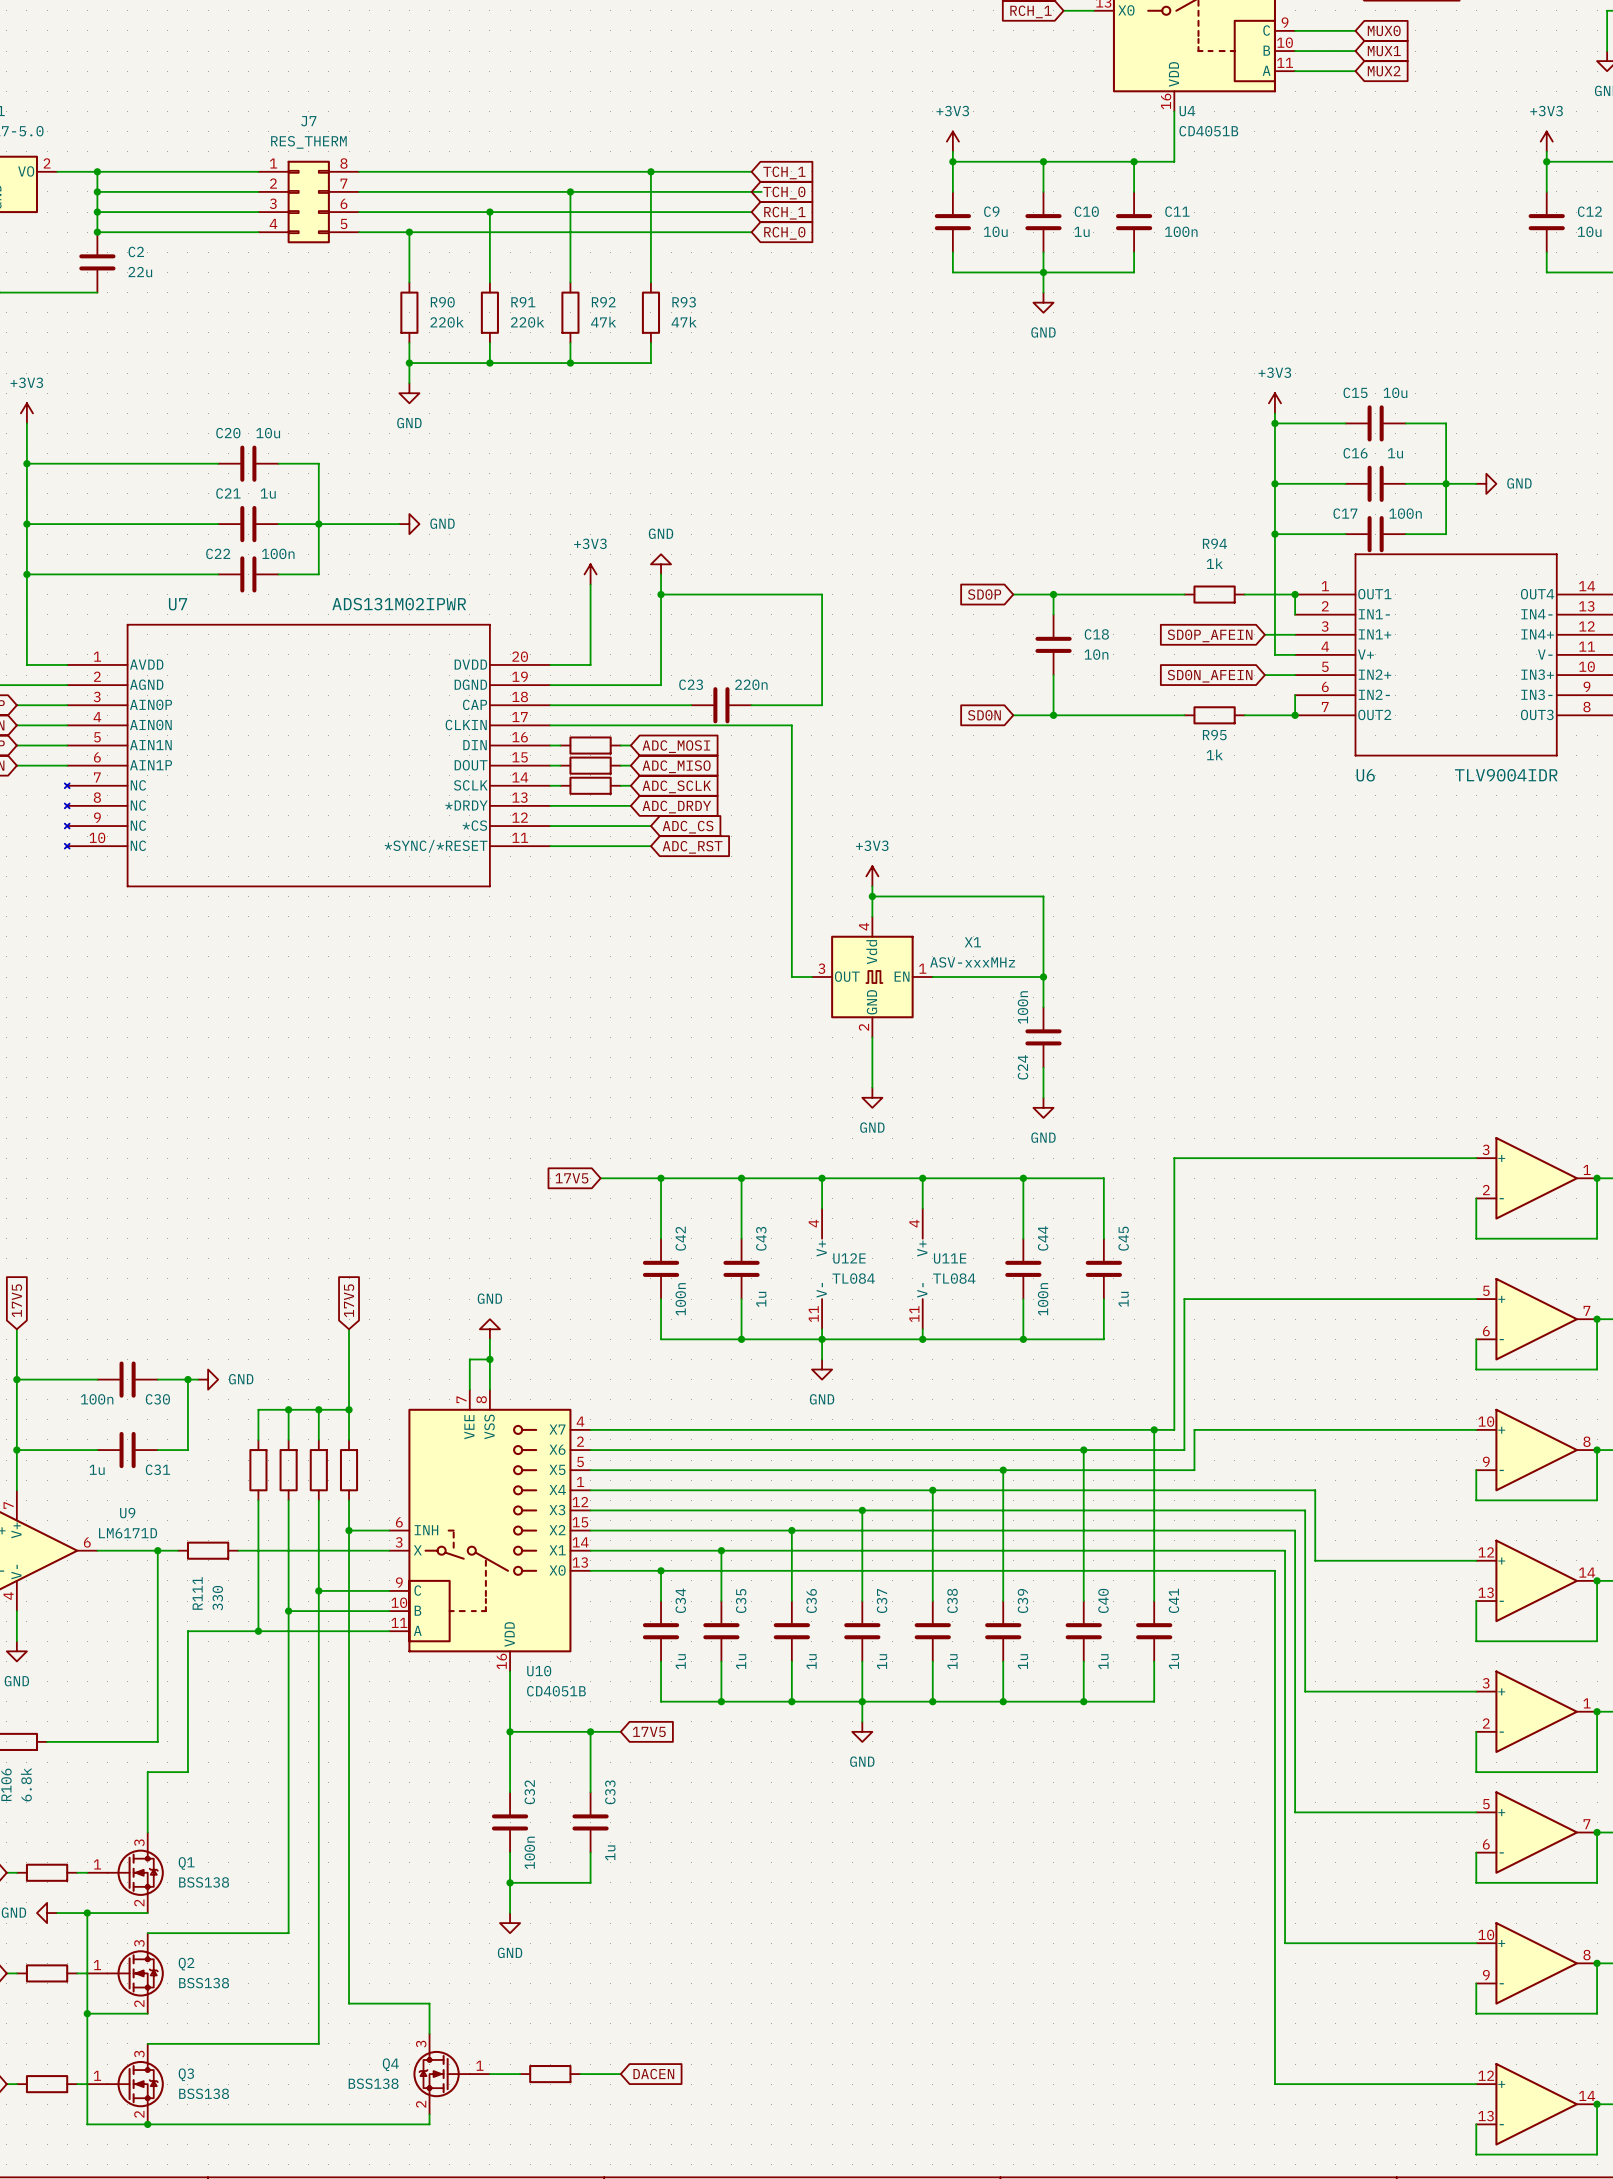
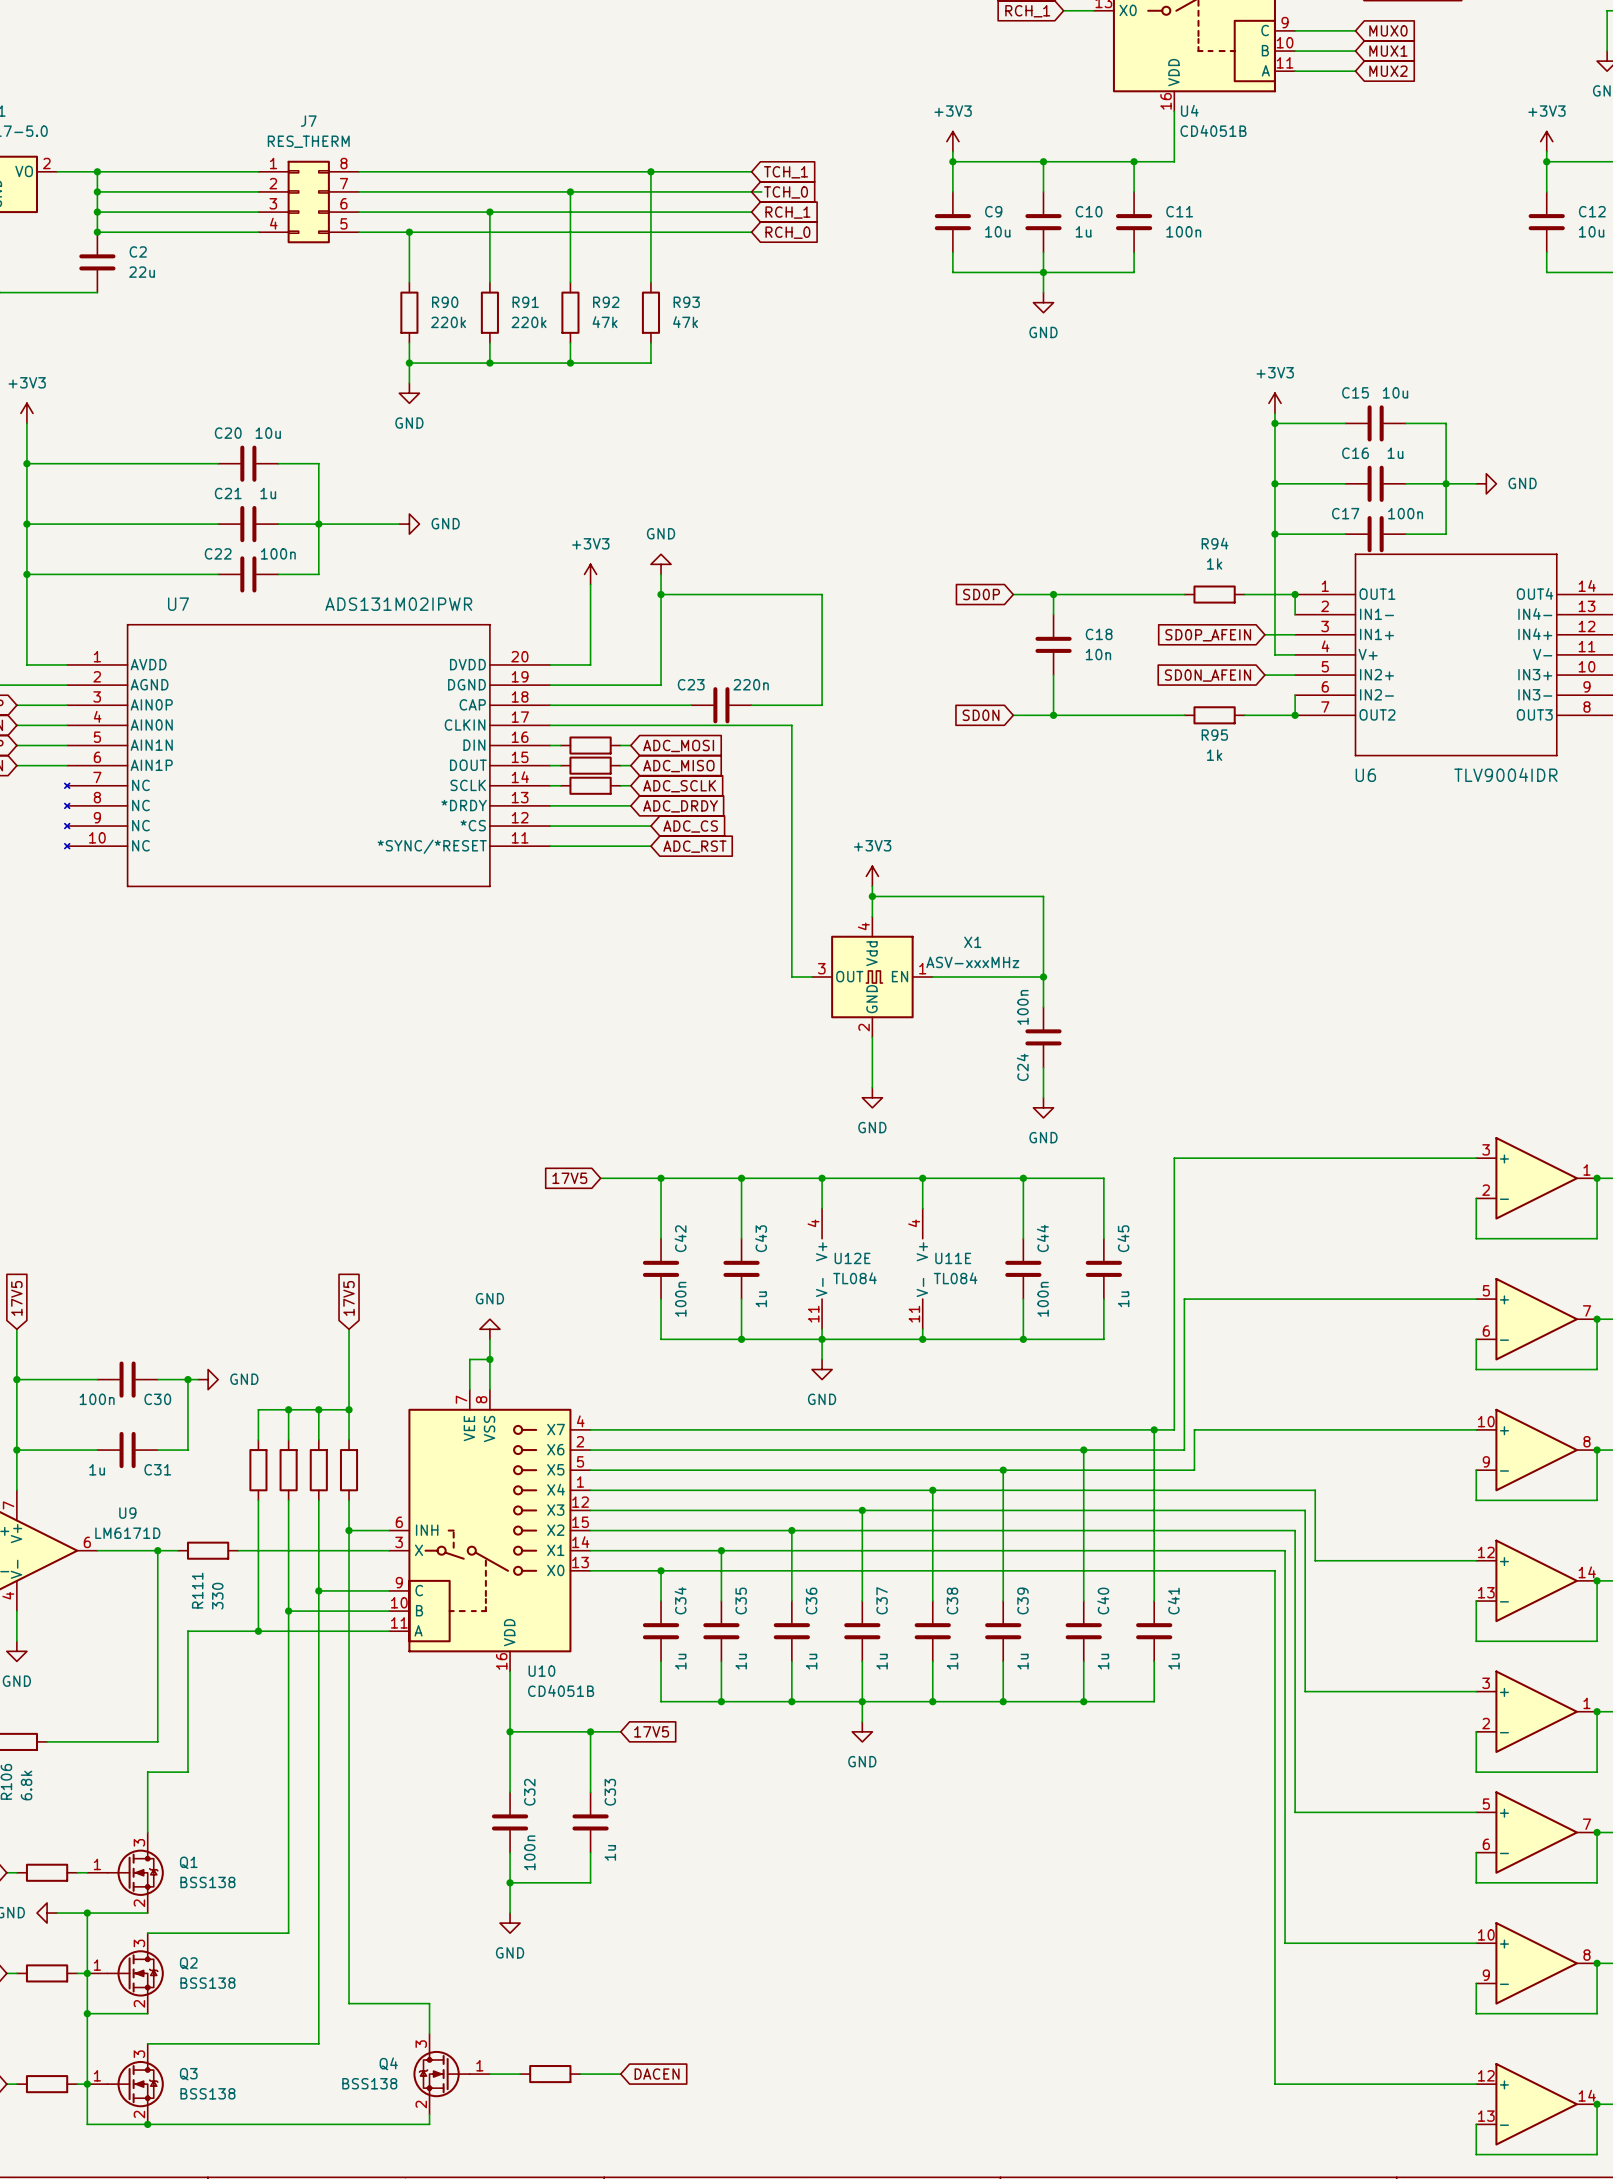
junction: none -> (87, 1973)
junction: none -> (87, 2084)

